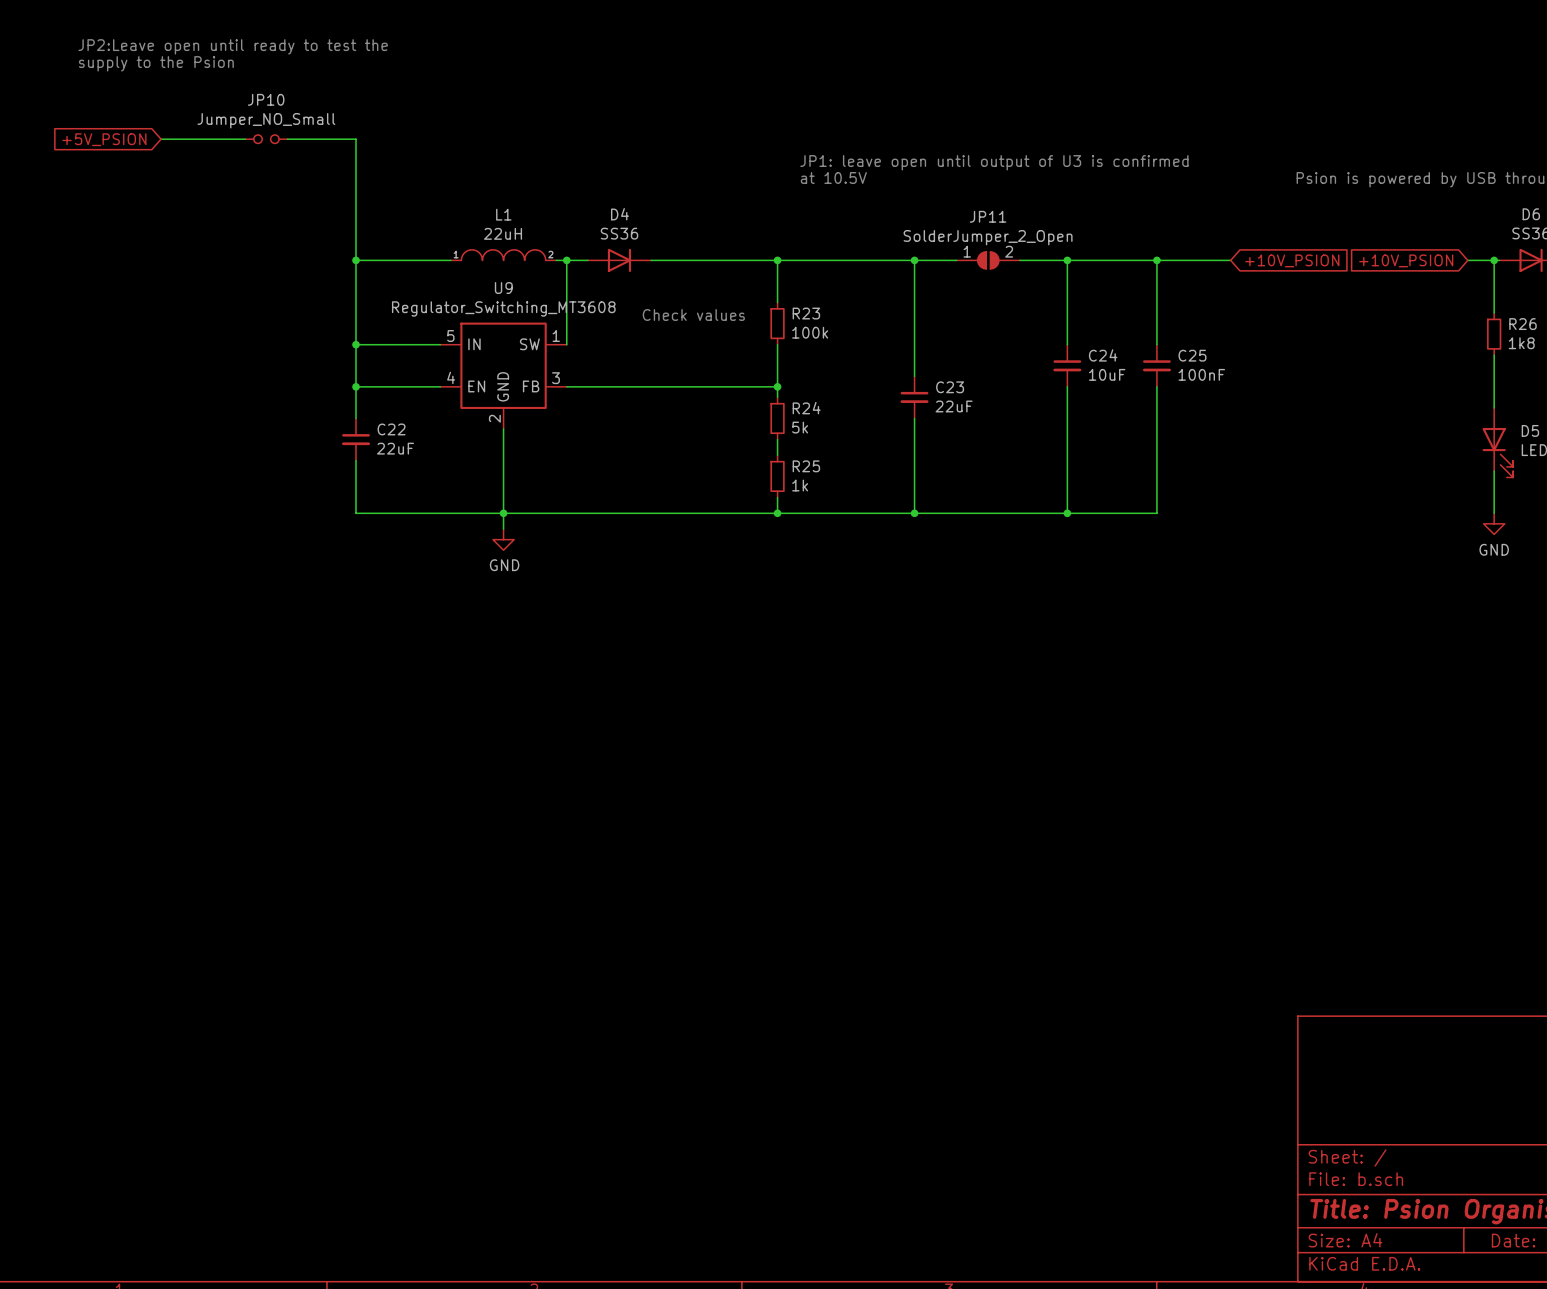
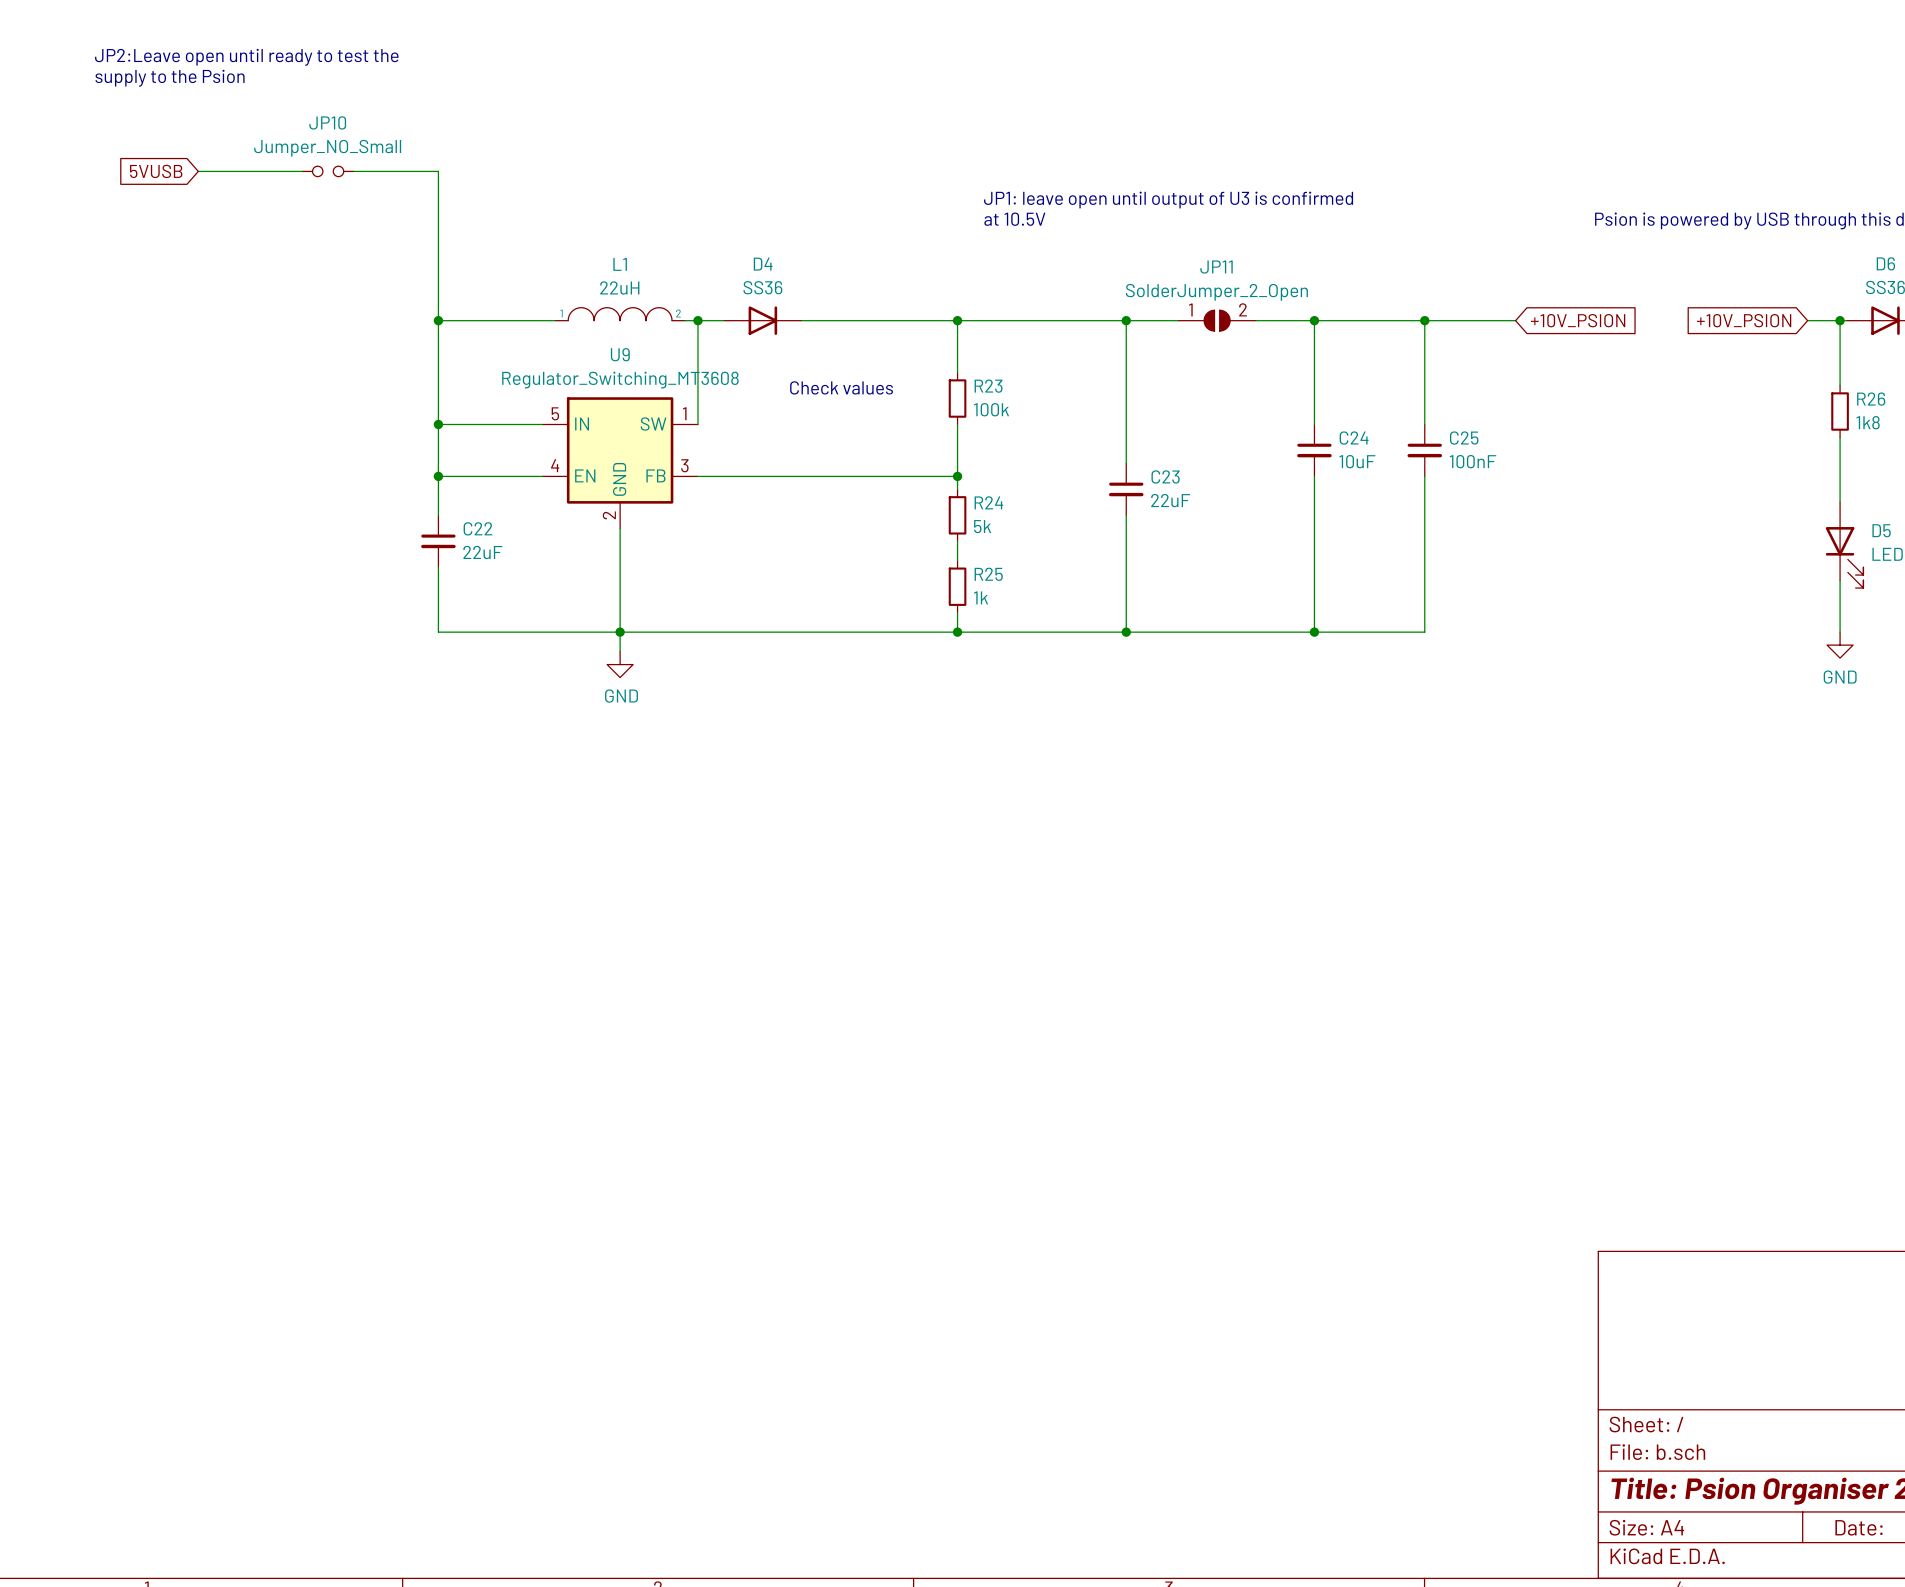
global label: +5V_PSION (104, 139) -> 5VUSB (156, 171)

